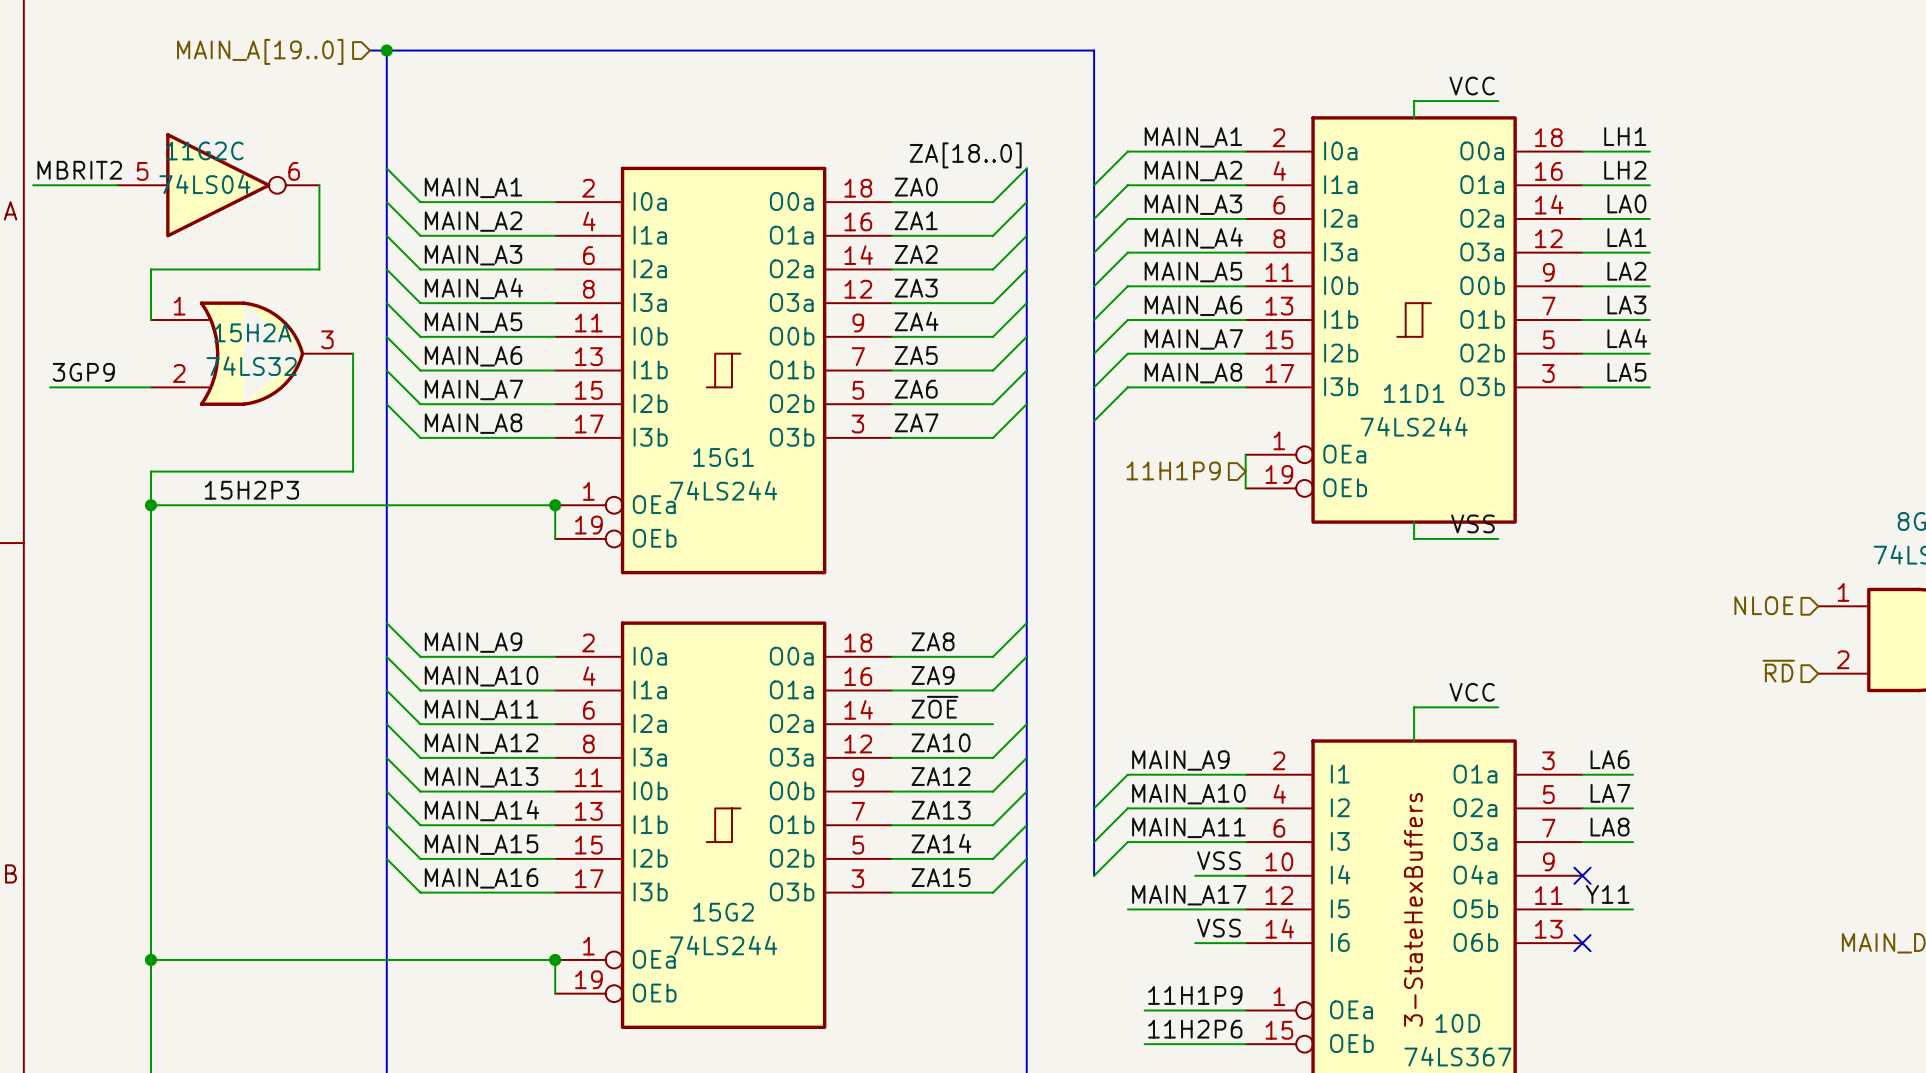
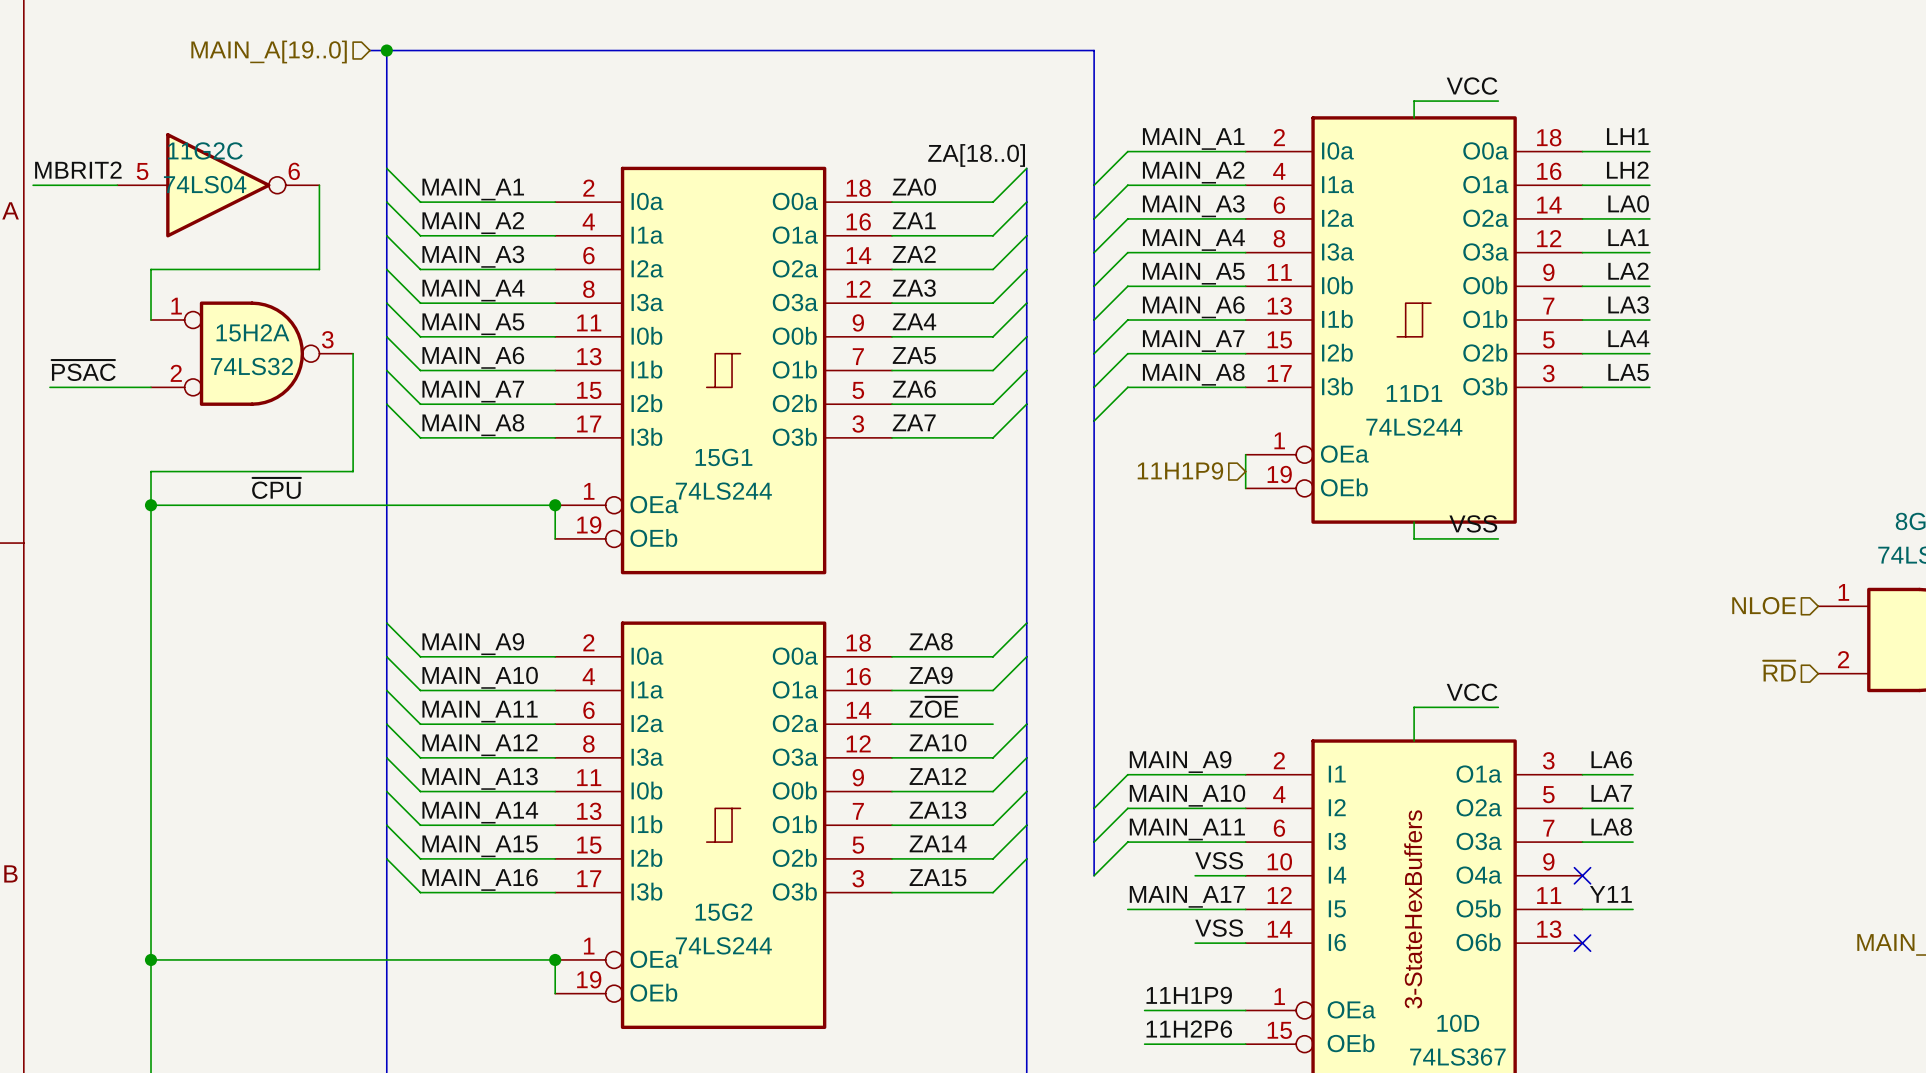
15H2A symbol: [151, 301, 354, 406] -> [151, 301, 354, 406]
label: 3GP9 (83, 372) -> ~{PSAC} (83, 370)
label: 15H2P3 (251, 490) -> ~{CPU} (276, 488)

